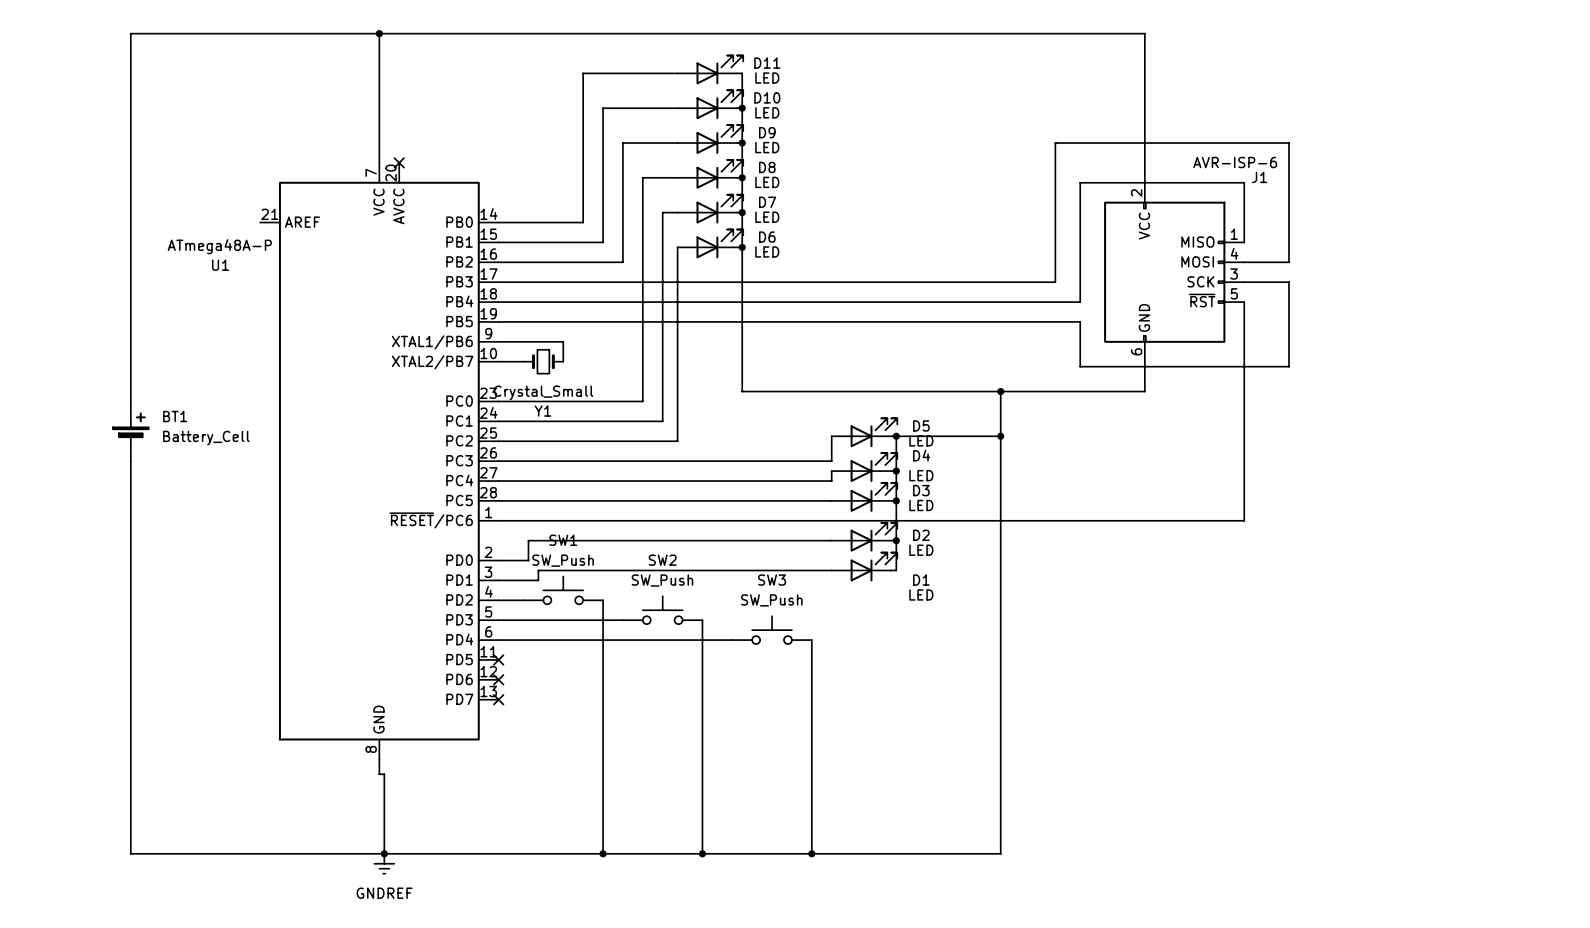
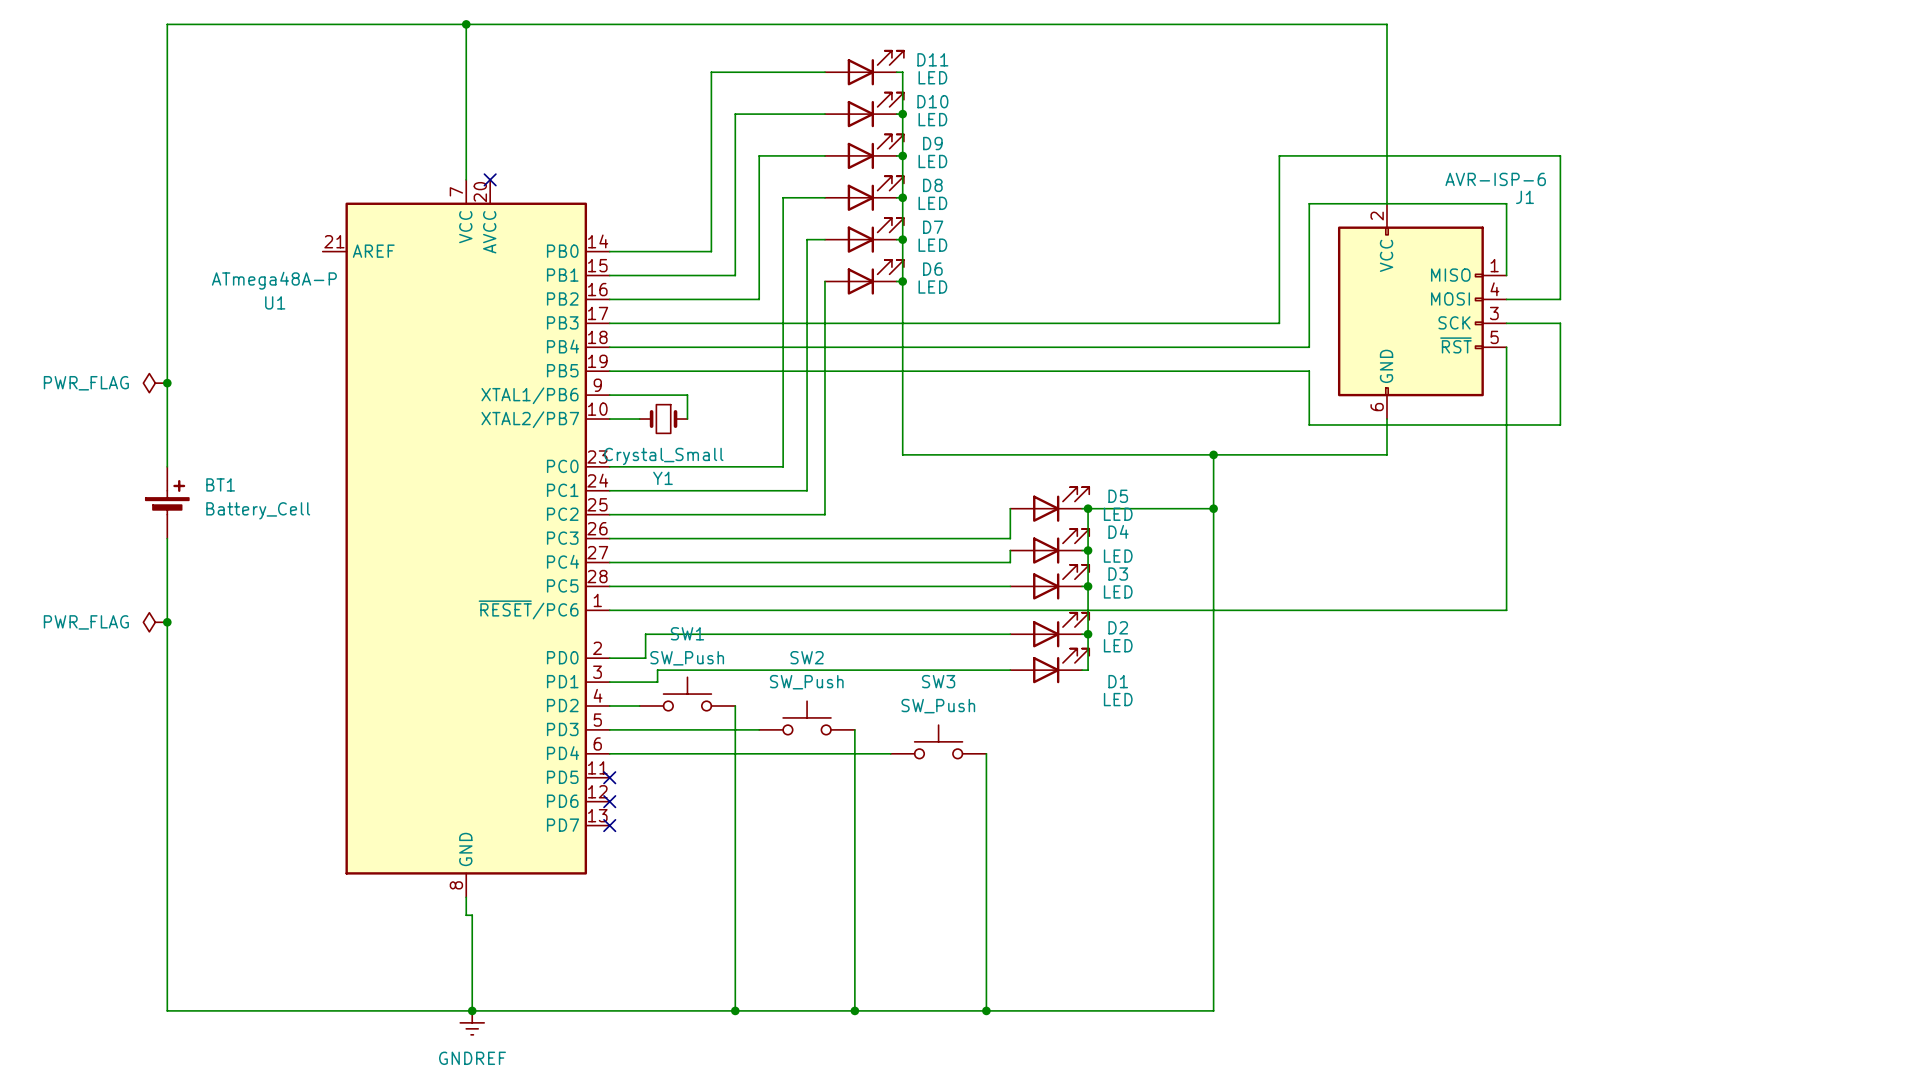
power symbol: none -> PWR_FLAG (155, 383)
junction: none -> (167, 383)
power symbol: none -> PWR_FLAG (155, 622)
junction: none -> (167, 622)

